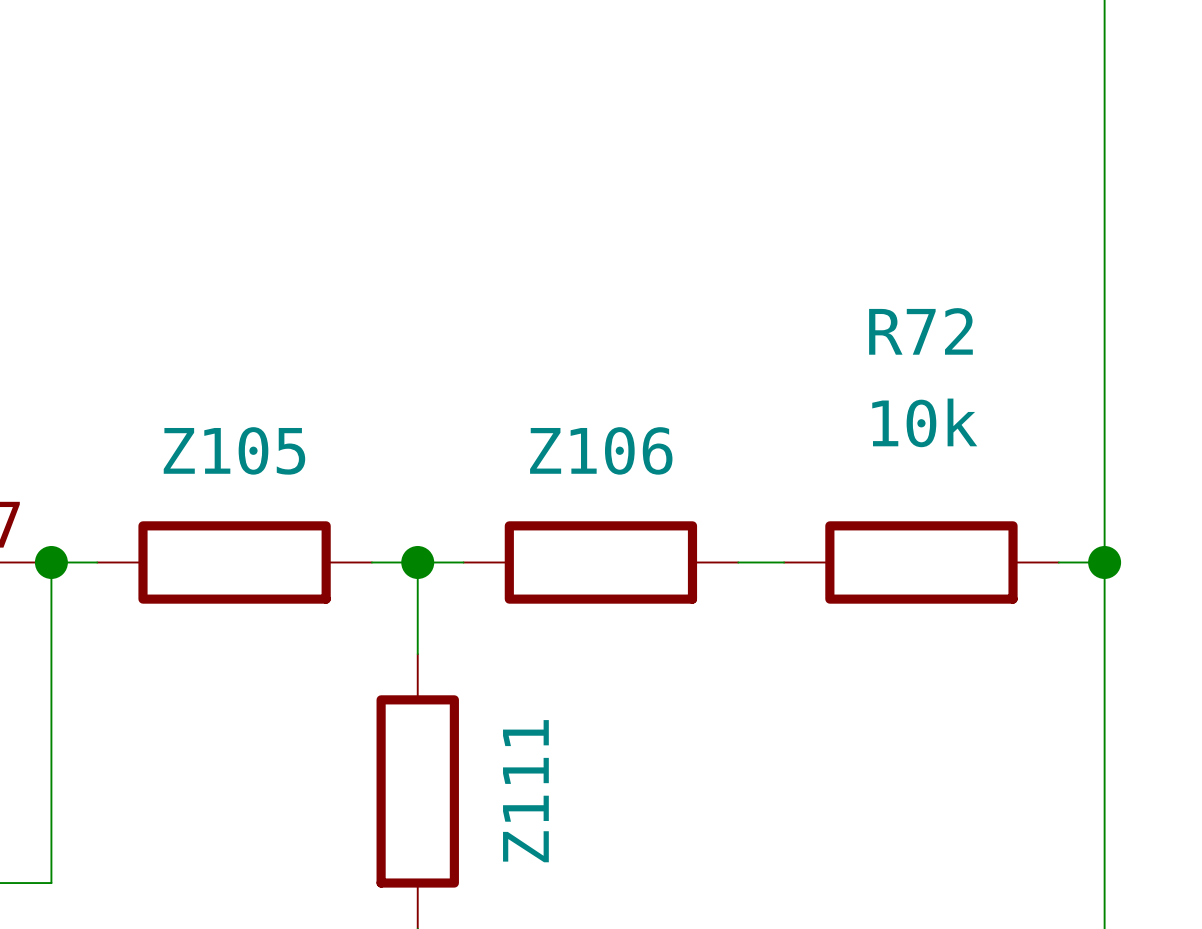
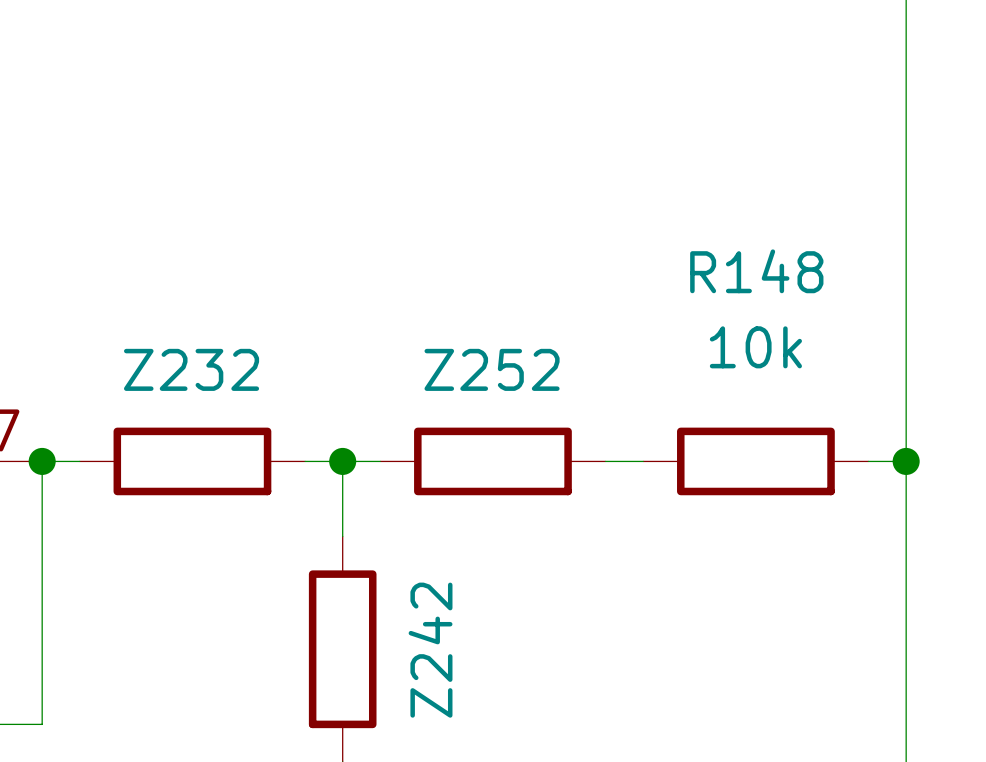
R72 name: R72 (920, 331) -> R148 (756, 271)
Z105 name: Z105 (234, 450) -> Z232 (191, 369)
Z106 name: Z106 (601, 450) -> Z252 (492, 369)
Z111 name: Z111 (525, 791) -> Z242 (430, 650)

